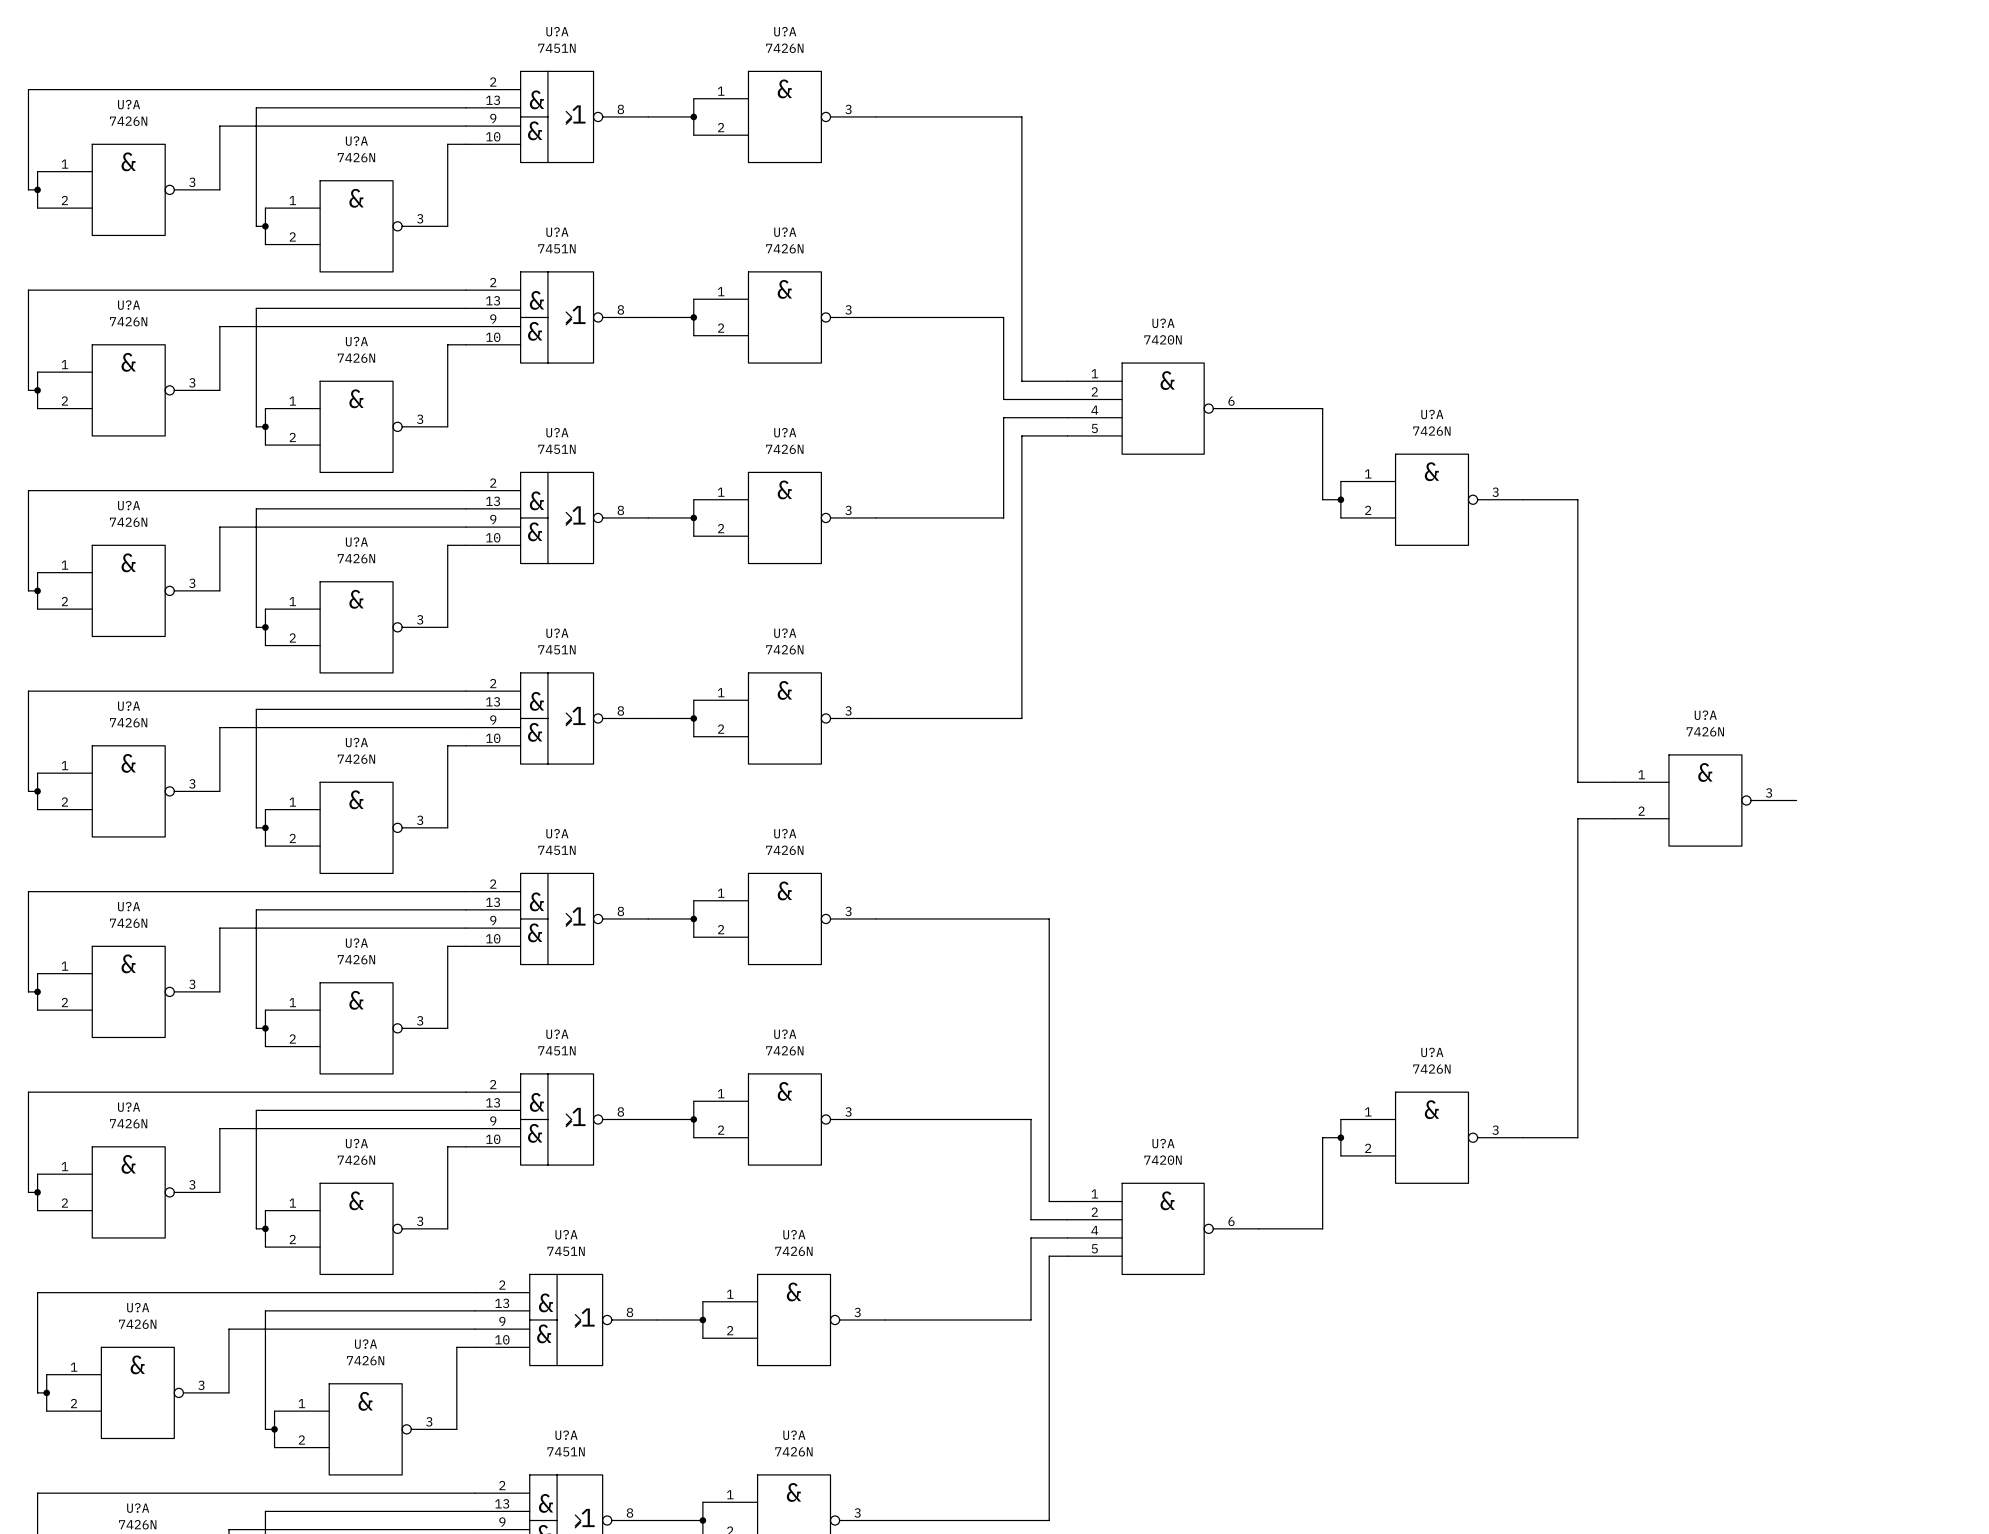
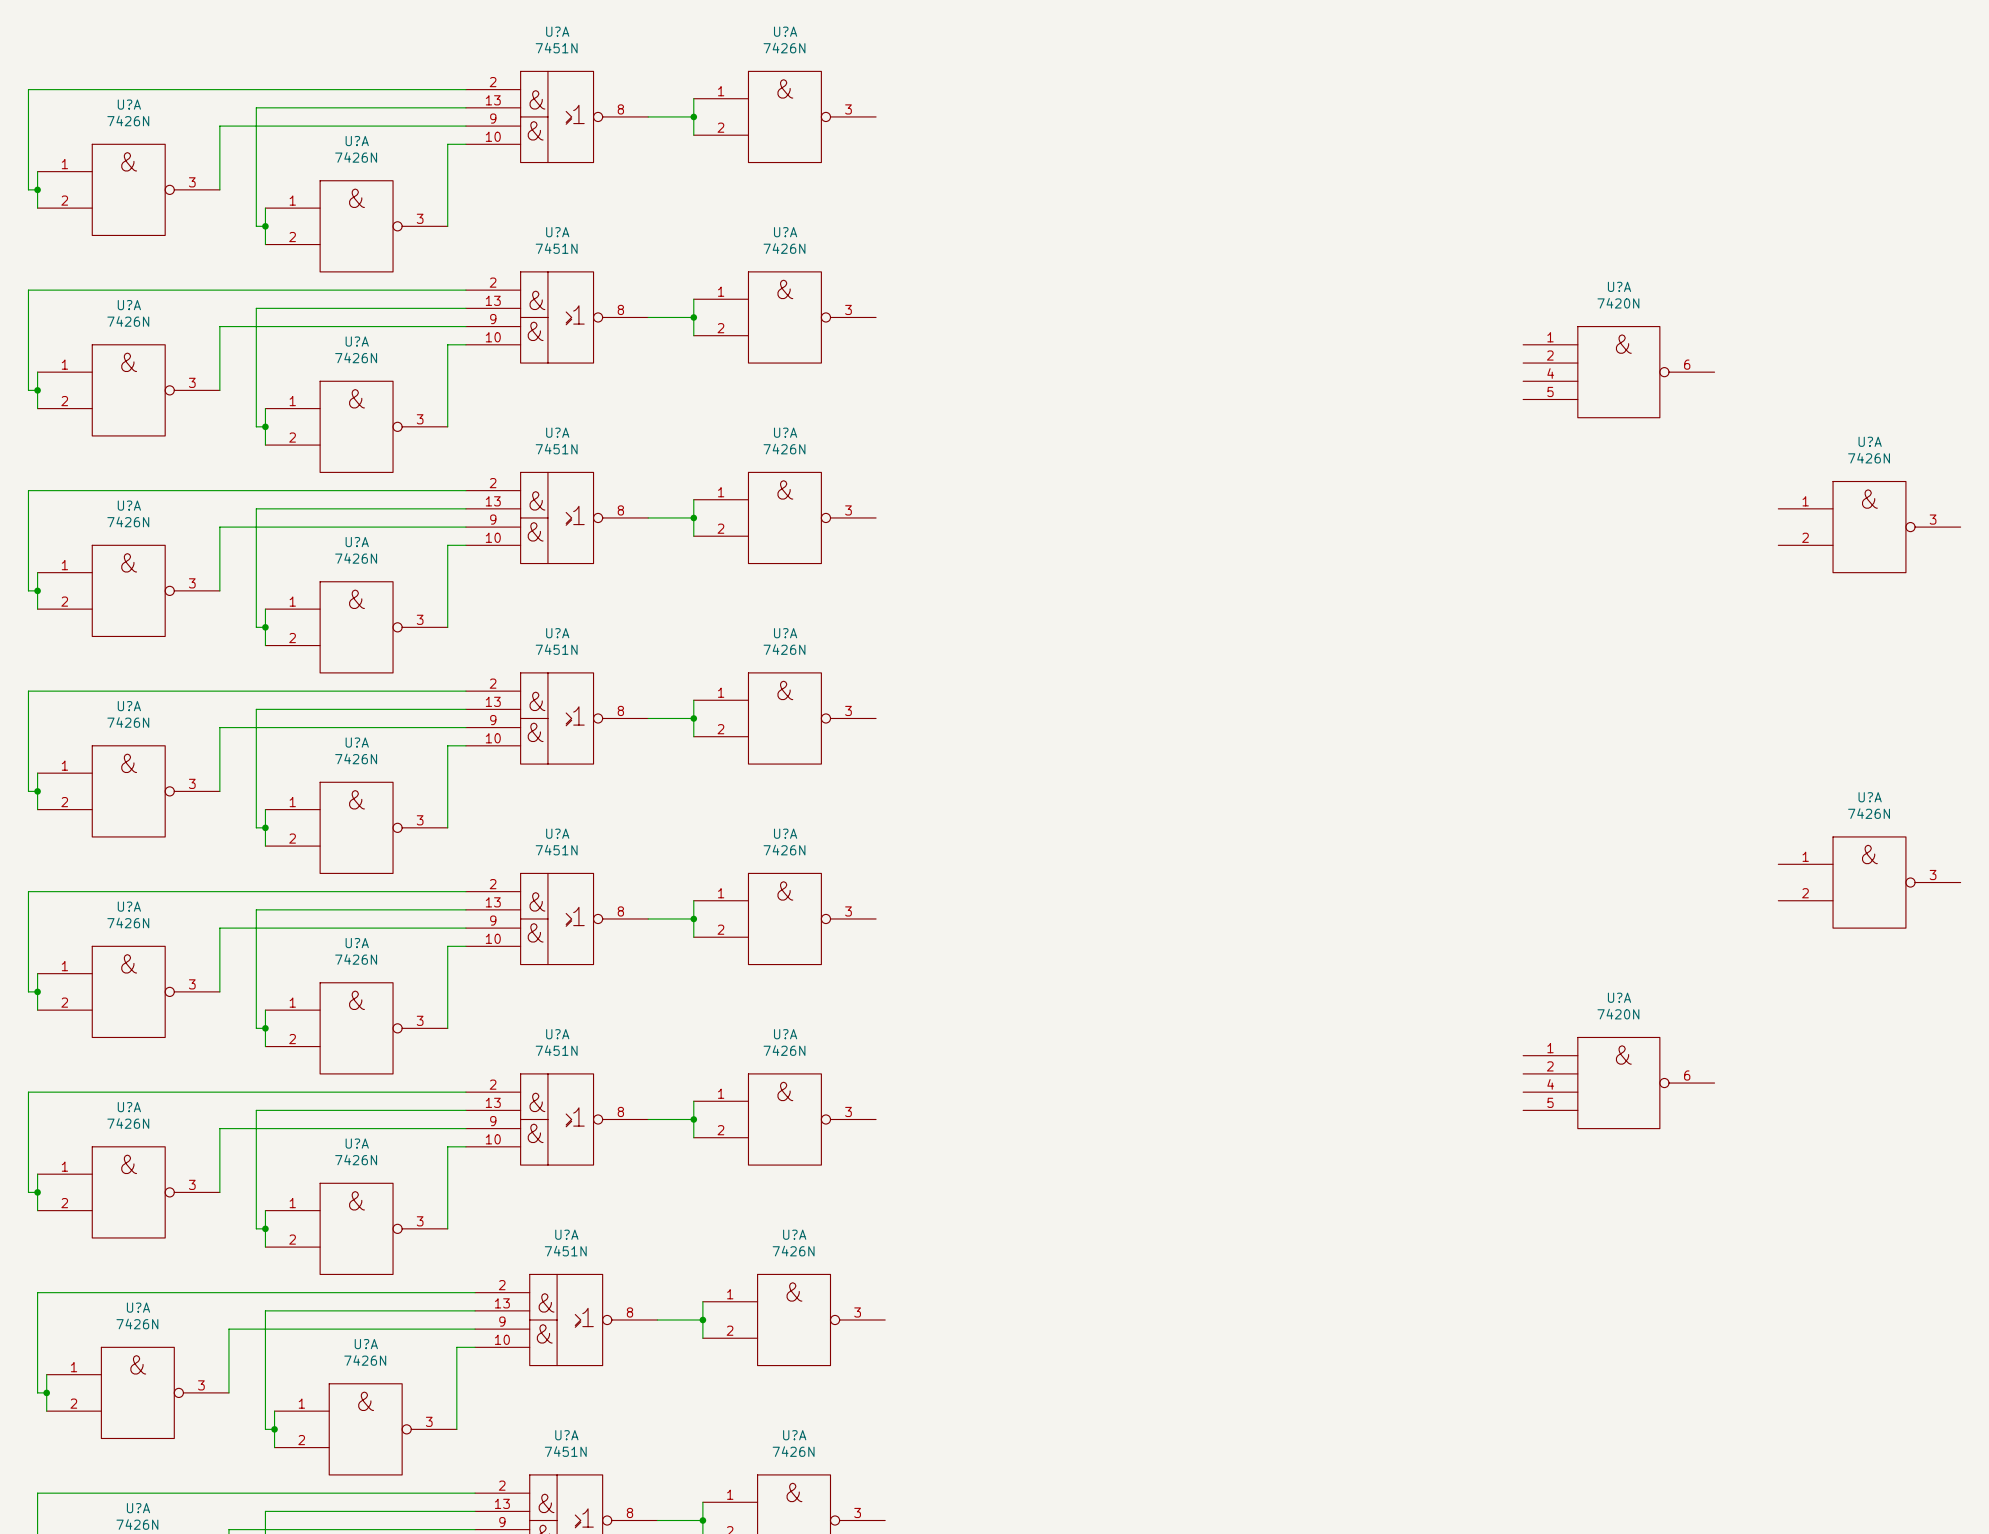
wire: (876, 116) (1021, 116) (1021, 381) (1067, 381) -> none
wire: (876, 317) (1003, 317) (1003, 399) (1067, 399) -> none
U?A: none -> 7420N (1618, 372)
U?A: 7420N (1163, 408) -> none
wire: (1258, 408) (1322, 408) (1322, 499) (1340, 499) -> none
wire: (1067, 417) (1003, 417) (1003, 517) (876, 517) -> none
wire: (1067, 435) (1021, 435) (1021, 718) (876, 718) -> none
wire: (1340, 481) (1340, 517) -> none
junction: (1340, 499) -> none
U?A: 7426N (1432, 499) -> none
wire: (1523, 499) (1577, 499) (1577, 782) (1614, 782) -> none
U?A: none -> 7426N (1869, 527)
U?A: 7426N (1705, 800) -> none
wire: (1614, 818) (1577, 818) (1577, 1137) (1523, 1137) -> none
U?A: none -> 7426N (1869, 882)
wire: (876, 918) (1049, 918) (1049, 1201) (1067, 1201) -> none
U?A: none -> 7420N (1618, 1083)
wire: (876, 1119) (1031, 1119) (1031, 1219) (1067, 1219) -> none
wire: (1340, 1119) (1340, 1155) -> none
wire: (1340, 1137) (1322, 1137) (1322, 1228) (1258, 1228) -> none
junction: (1340, 1137) -> none
U?A: 7426N (1432, 1137) -> none
U?A: 7420N (1163, 1228) -> none
wire: (1067, 1237) (1031, 1237) (1031, 1319) (885, 1319) -> none
wire: (1067, 1256) (1049, 1256) (1049, 1520) (885, 1520) -> none

